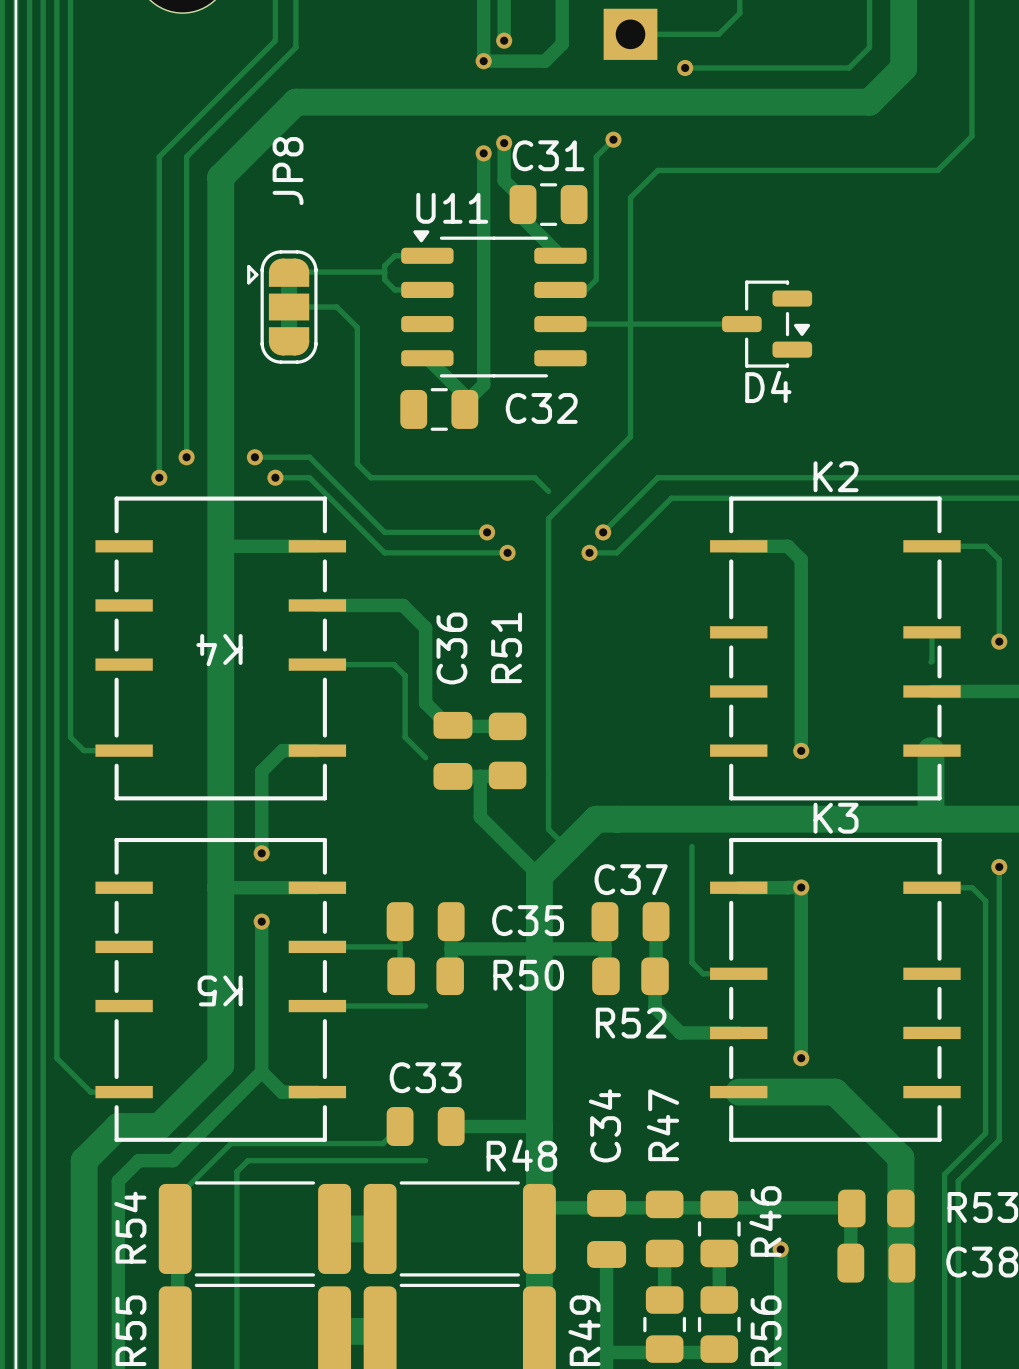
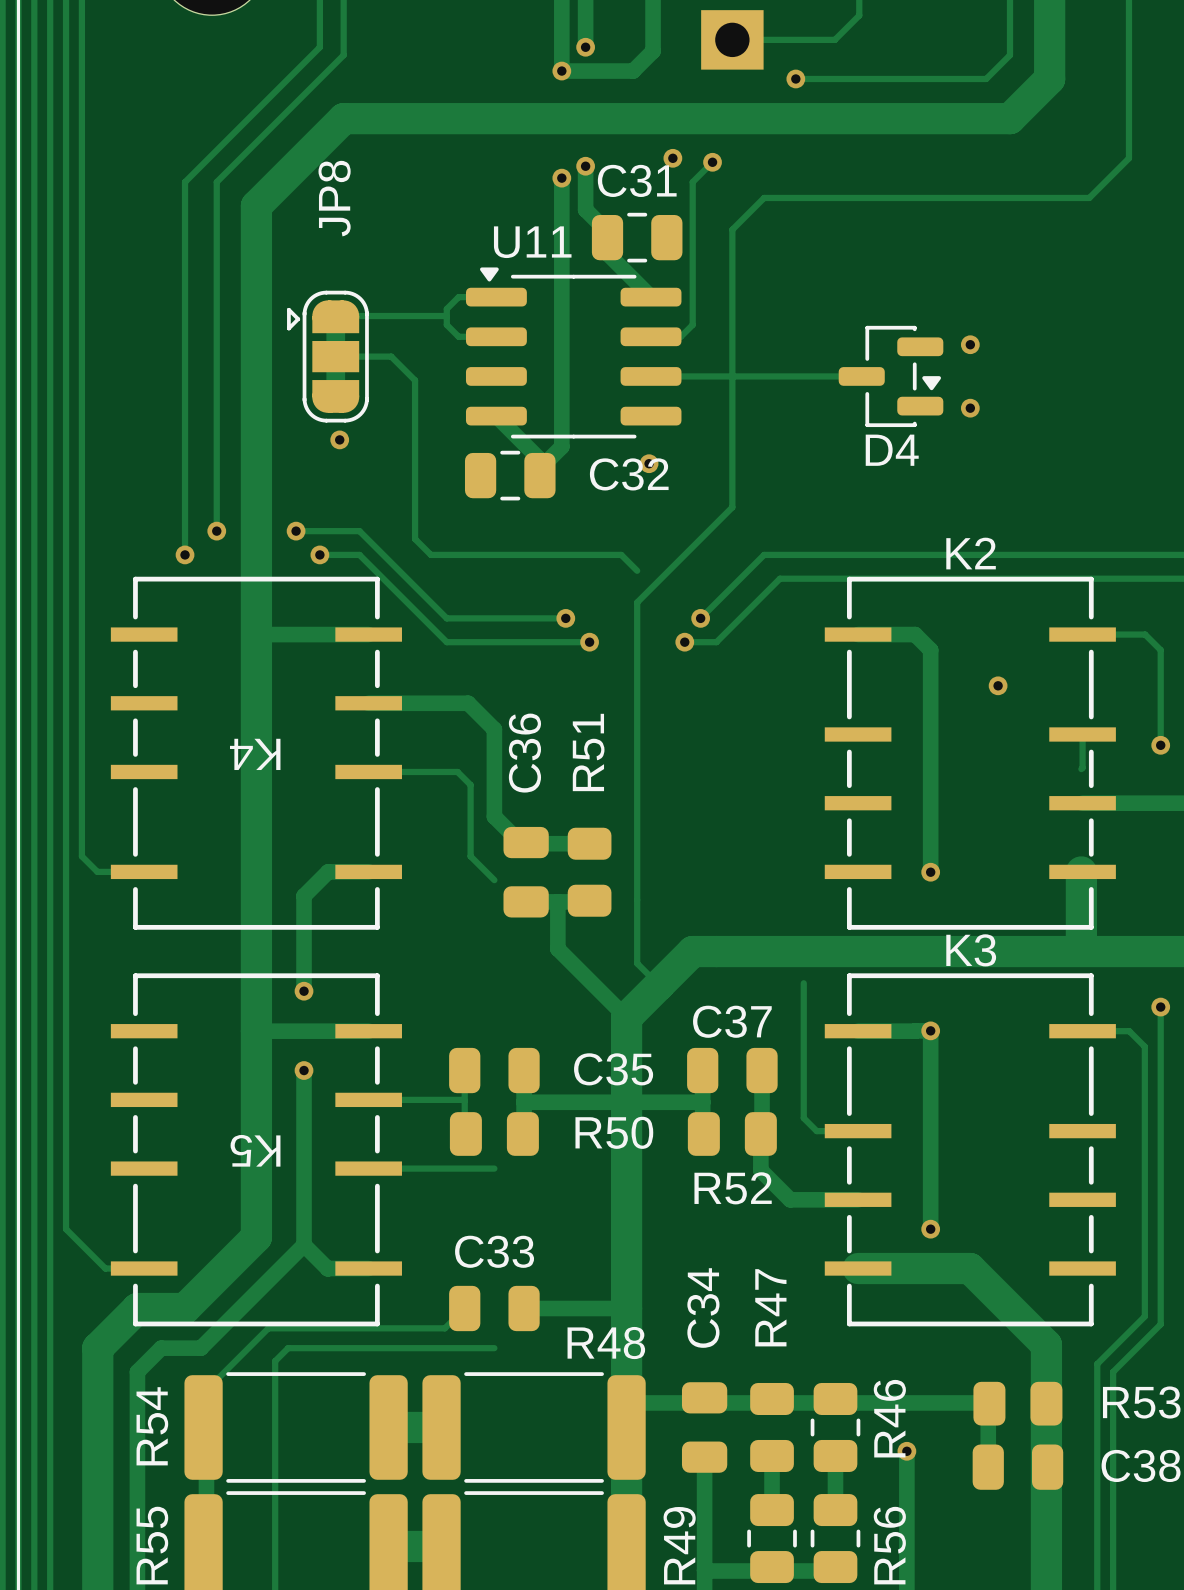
via: none -> (672, 158)
via: none -> (970, 344)
via: none -> (970, 408)
via: none -> (339, 439)
via: none -> (649, 463)
via: none -> (998, 685)

